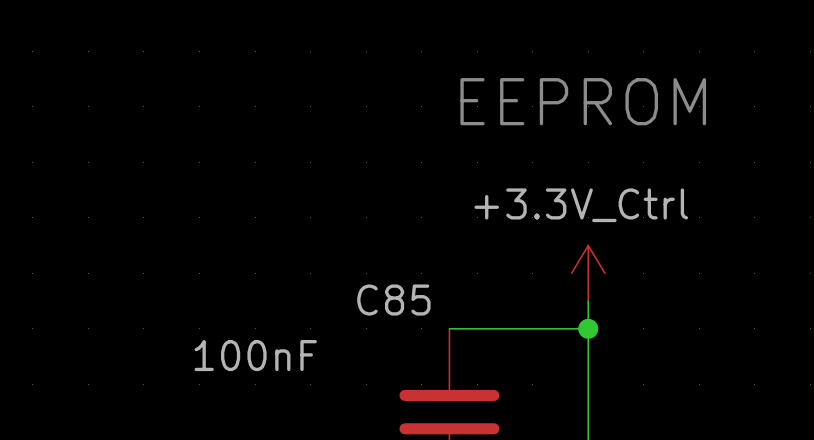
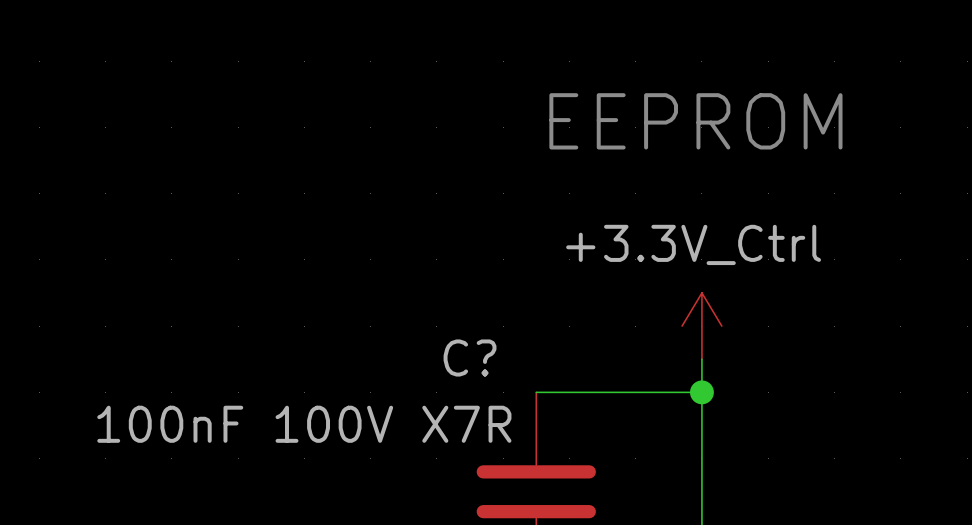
C85 name: C85 (393, 300) -> C? (470, 358)
C85 value: 100nF (255, 355) -> 100nF 100V X7R (304, 424)

